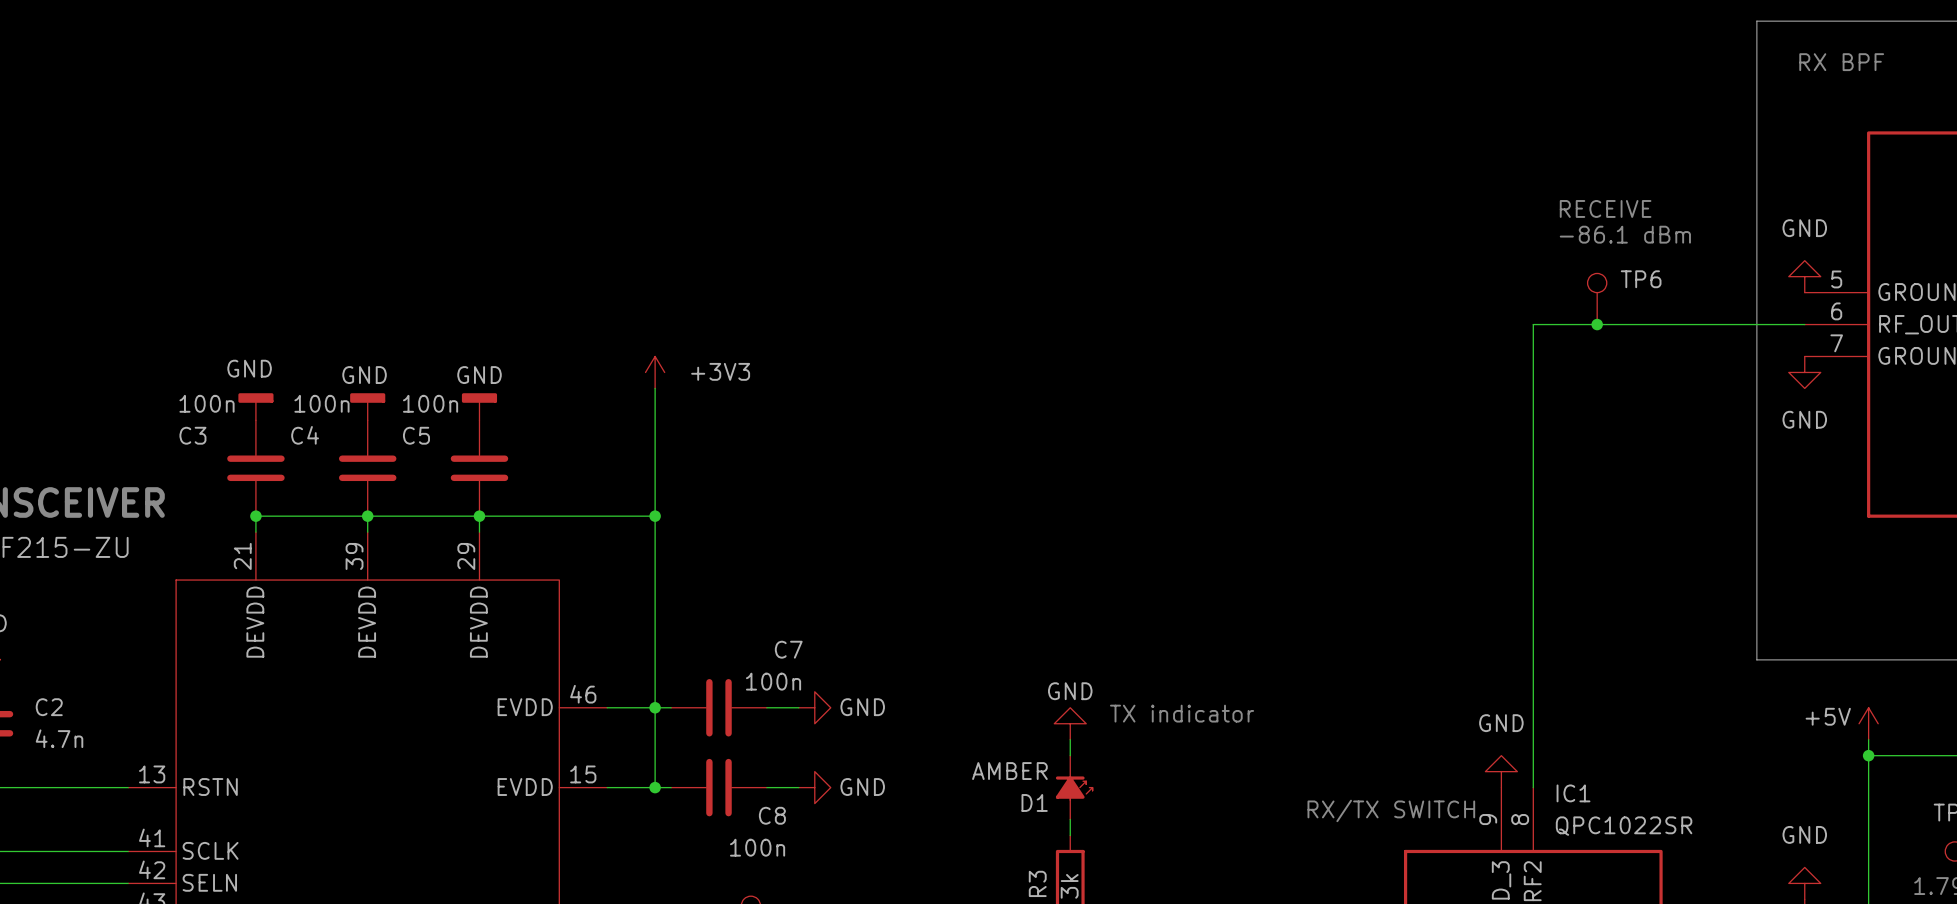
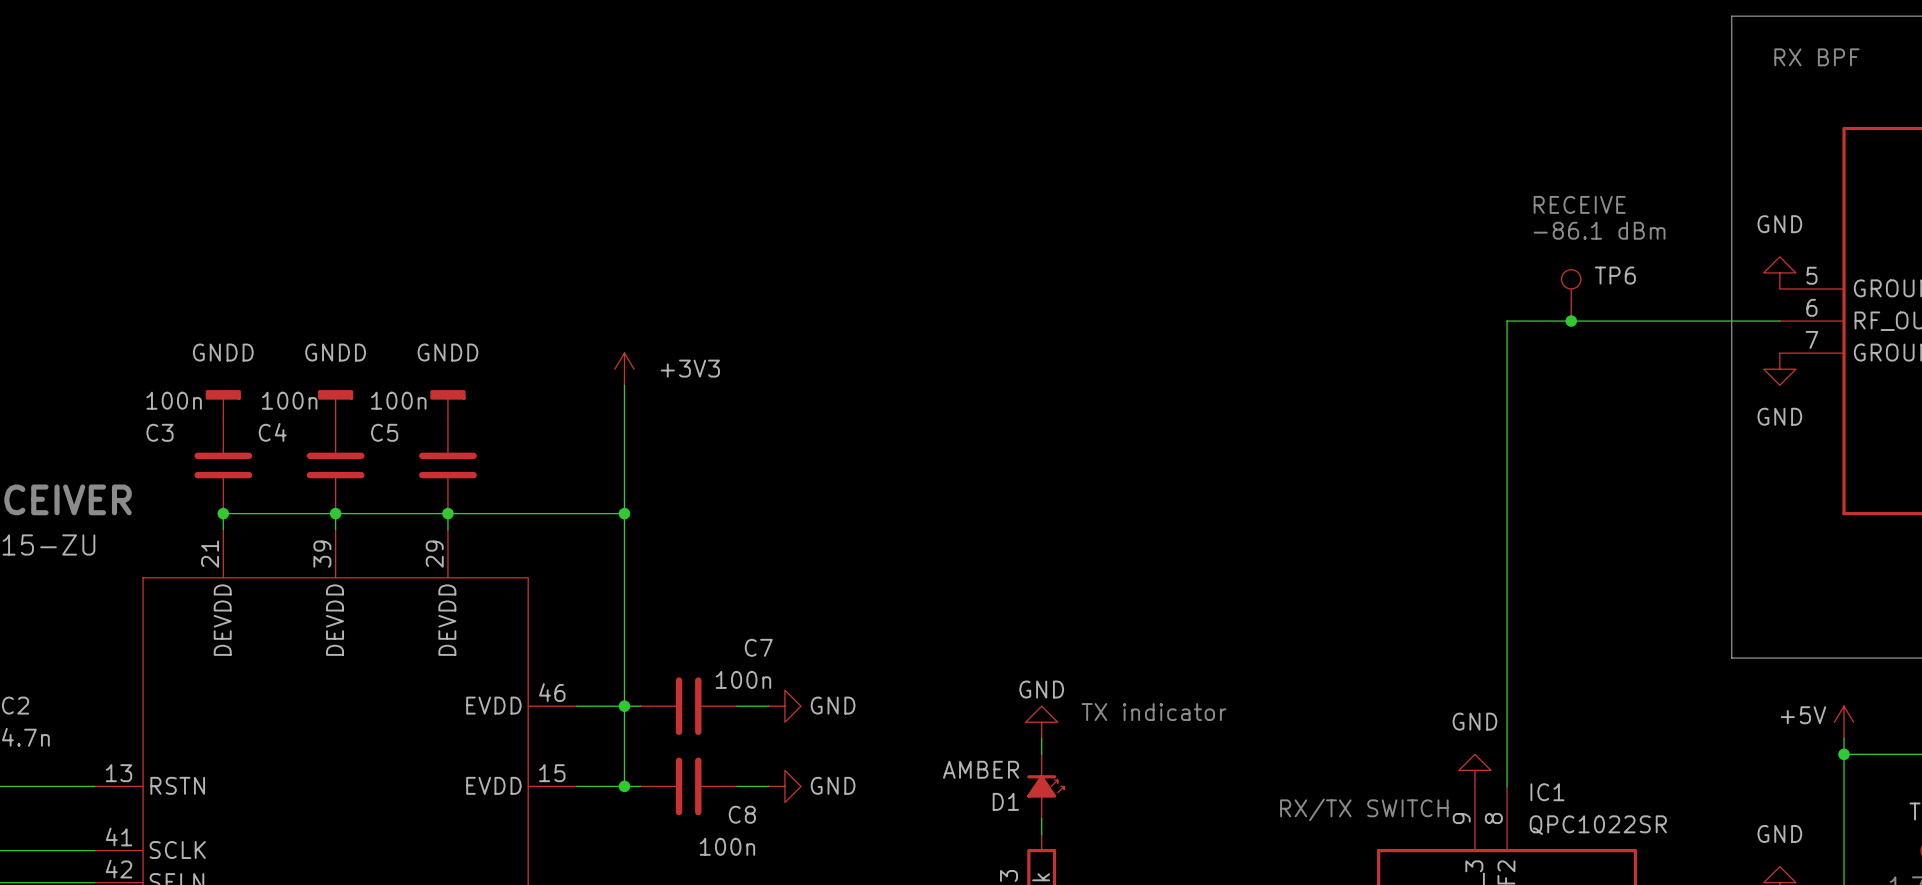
power symbol: GND (255, 406) -> GNDD (223, 403)
power symbol: GND (367, 406) -> GNDD (335, 403)
power symbol: GND (479, 406) -> GNDD (447, 403)

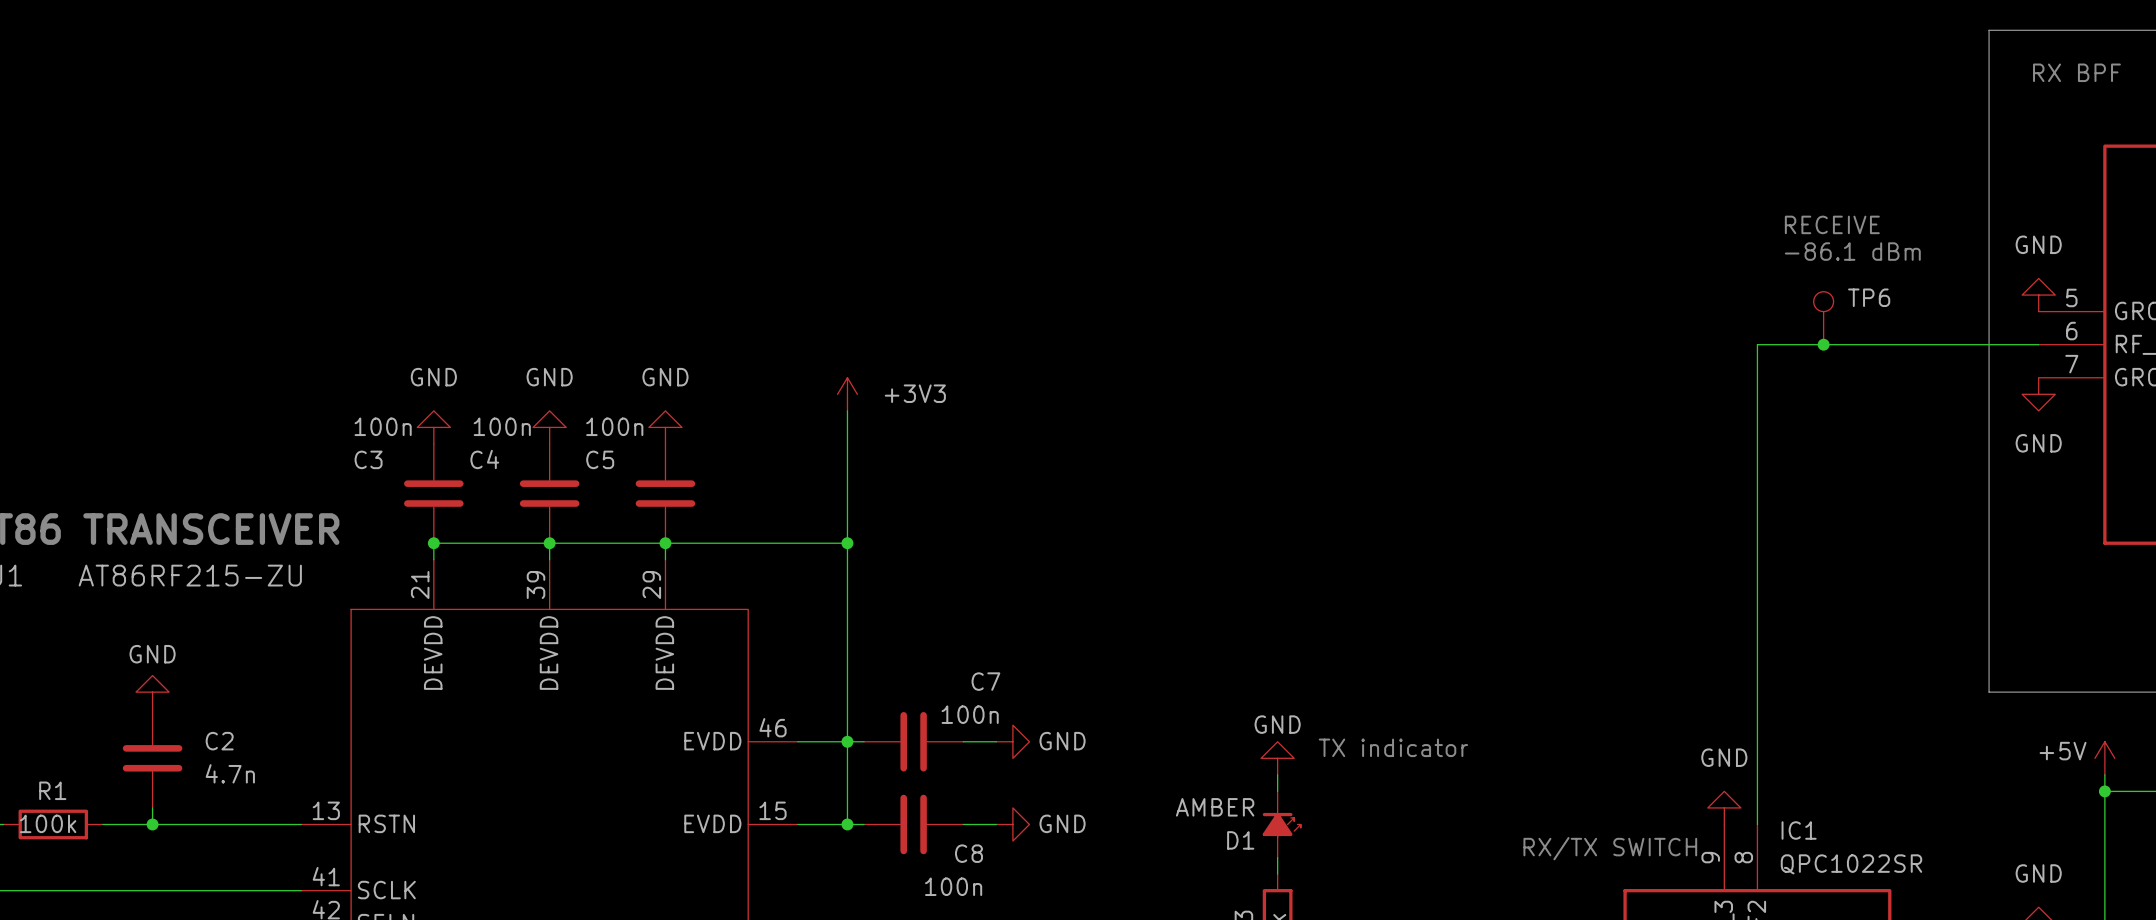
power symbol: GNDD (223, 403) -> GND (433, 427)
power symbol: GNDD (335, 403) -> GND (549, 427)
power symbol: GNDD (447, 403) -> GND (665, 427)

